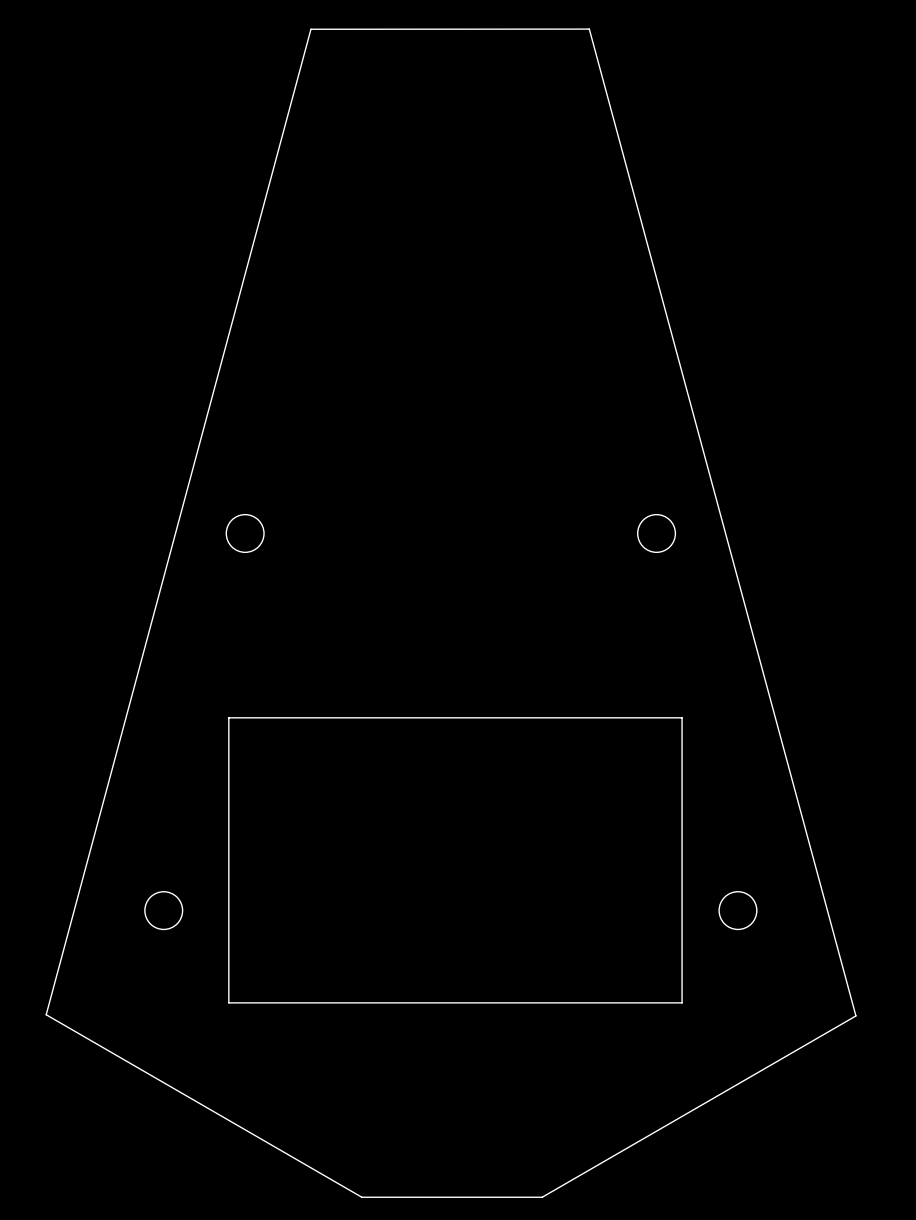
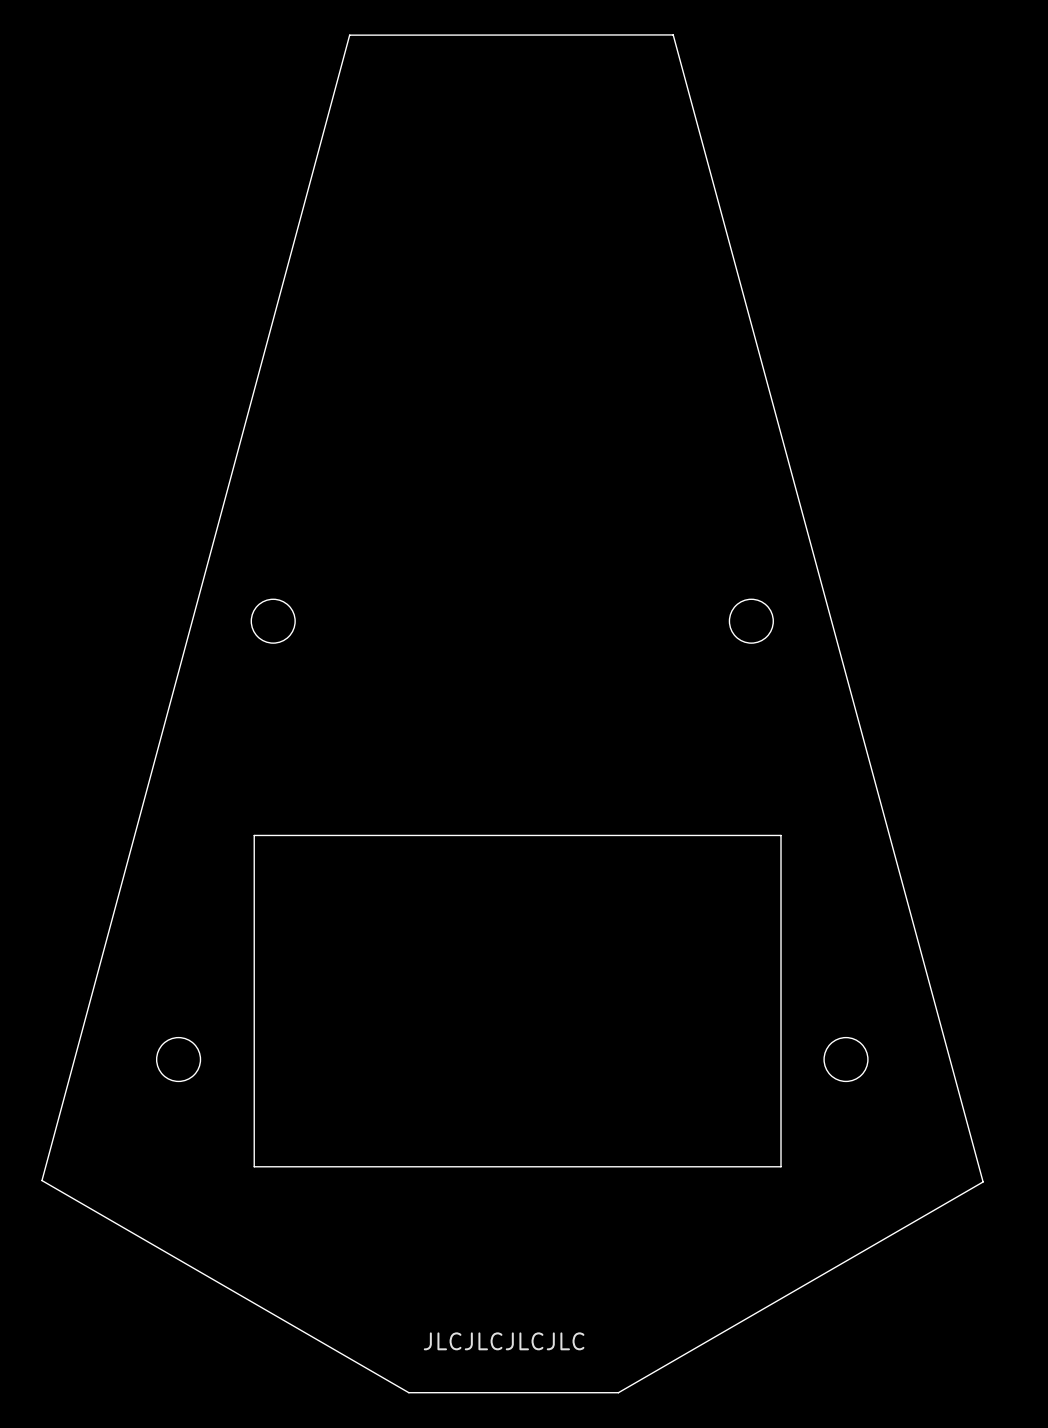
text: none -> JLCJLCJLCJLC (504, 1341)

